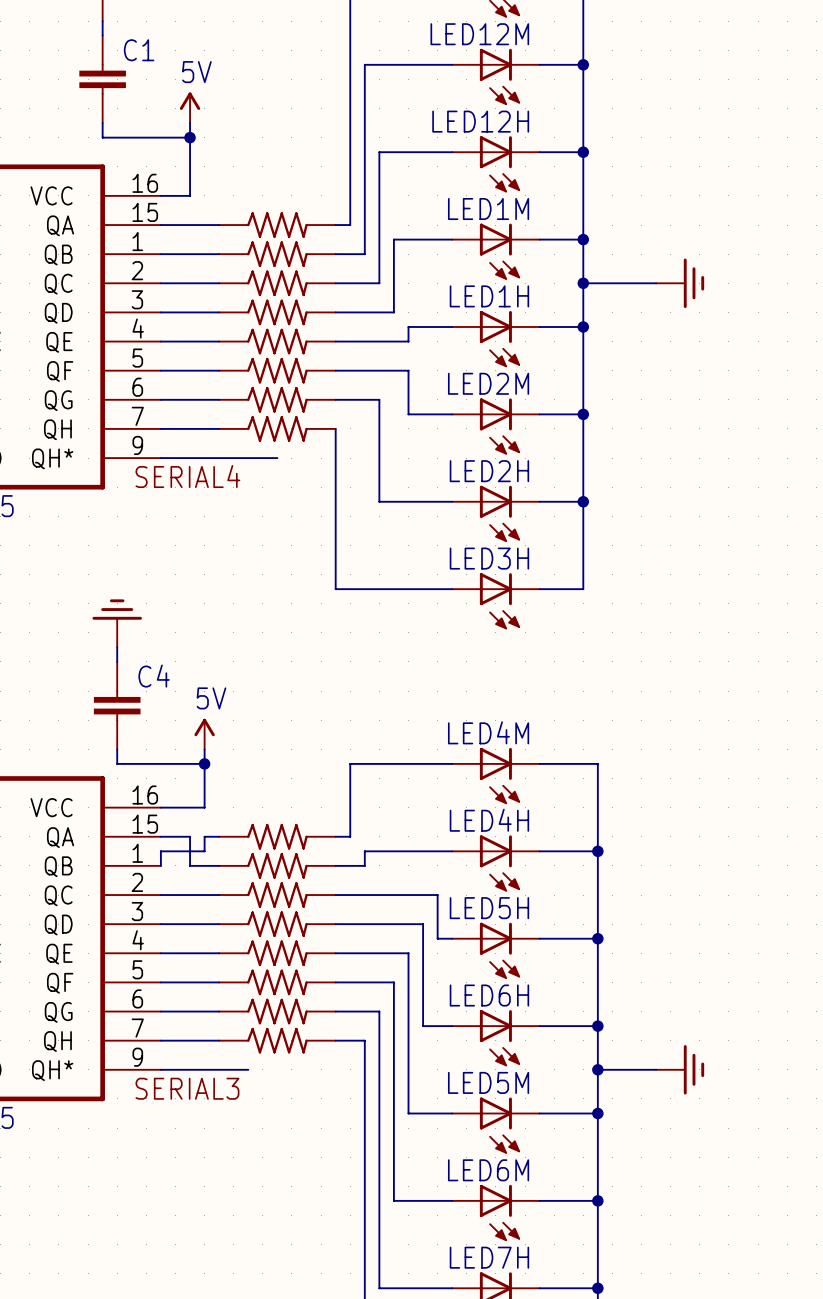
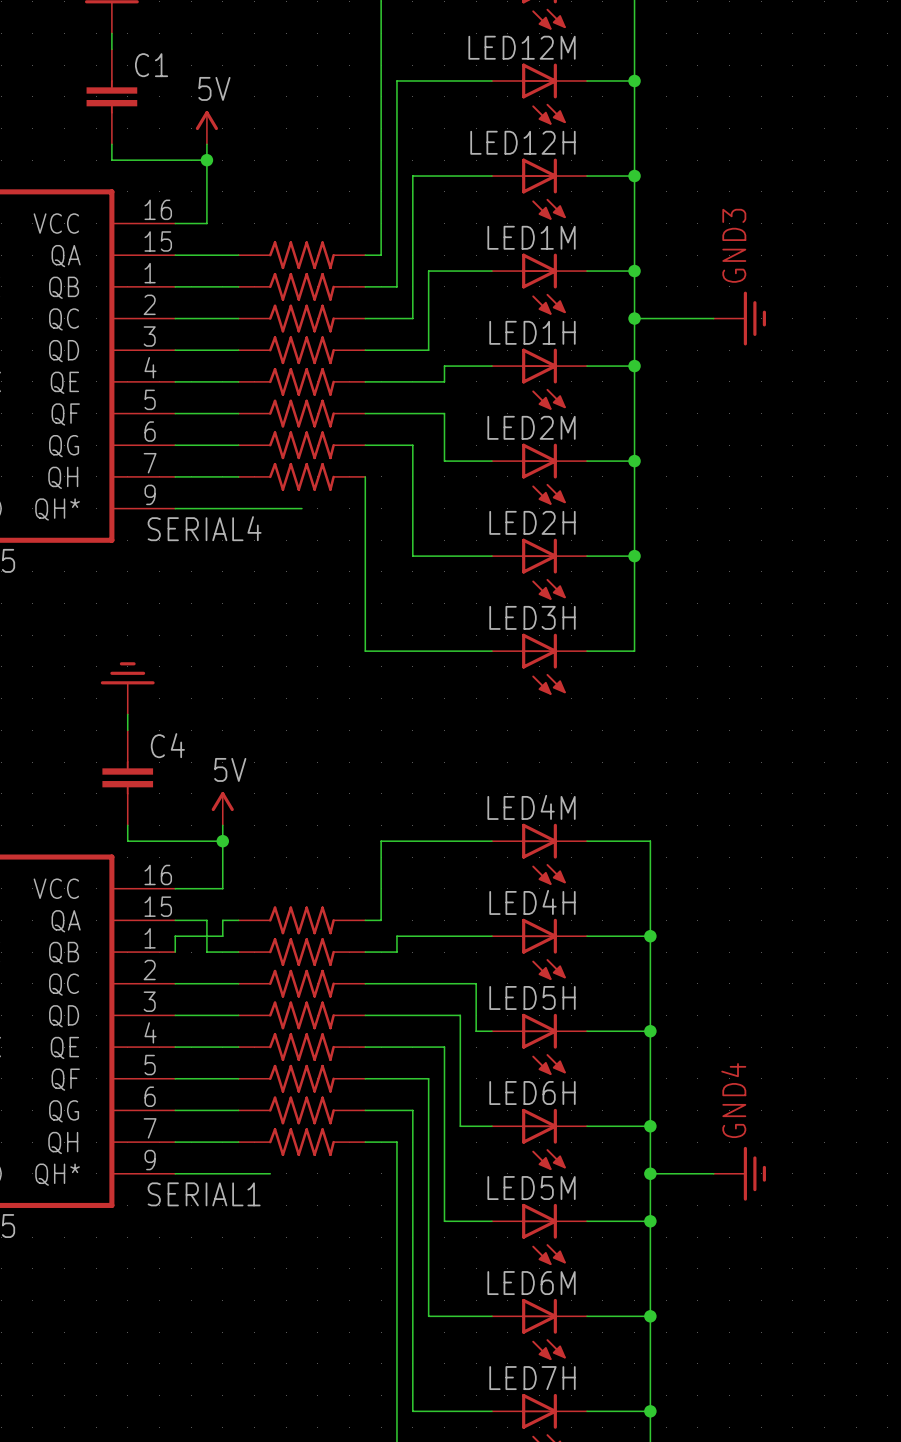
GND3 name: none -> GND3 (734, 245)
GND4 name: none -> GND4 (733, 1100)
label: SERIAL3 (187, 1088) -> SERIAL1 (204, 1194)

